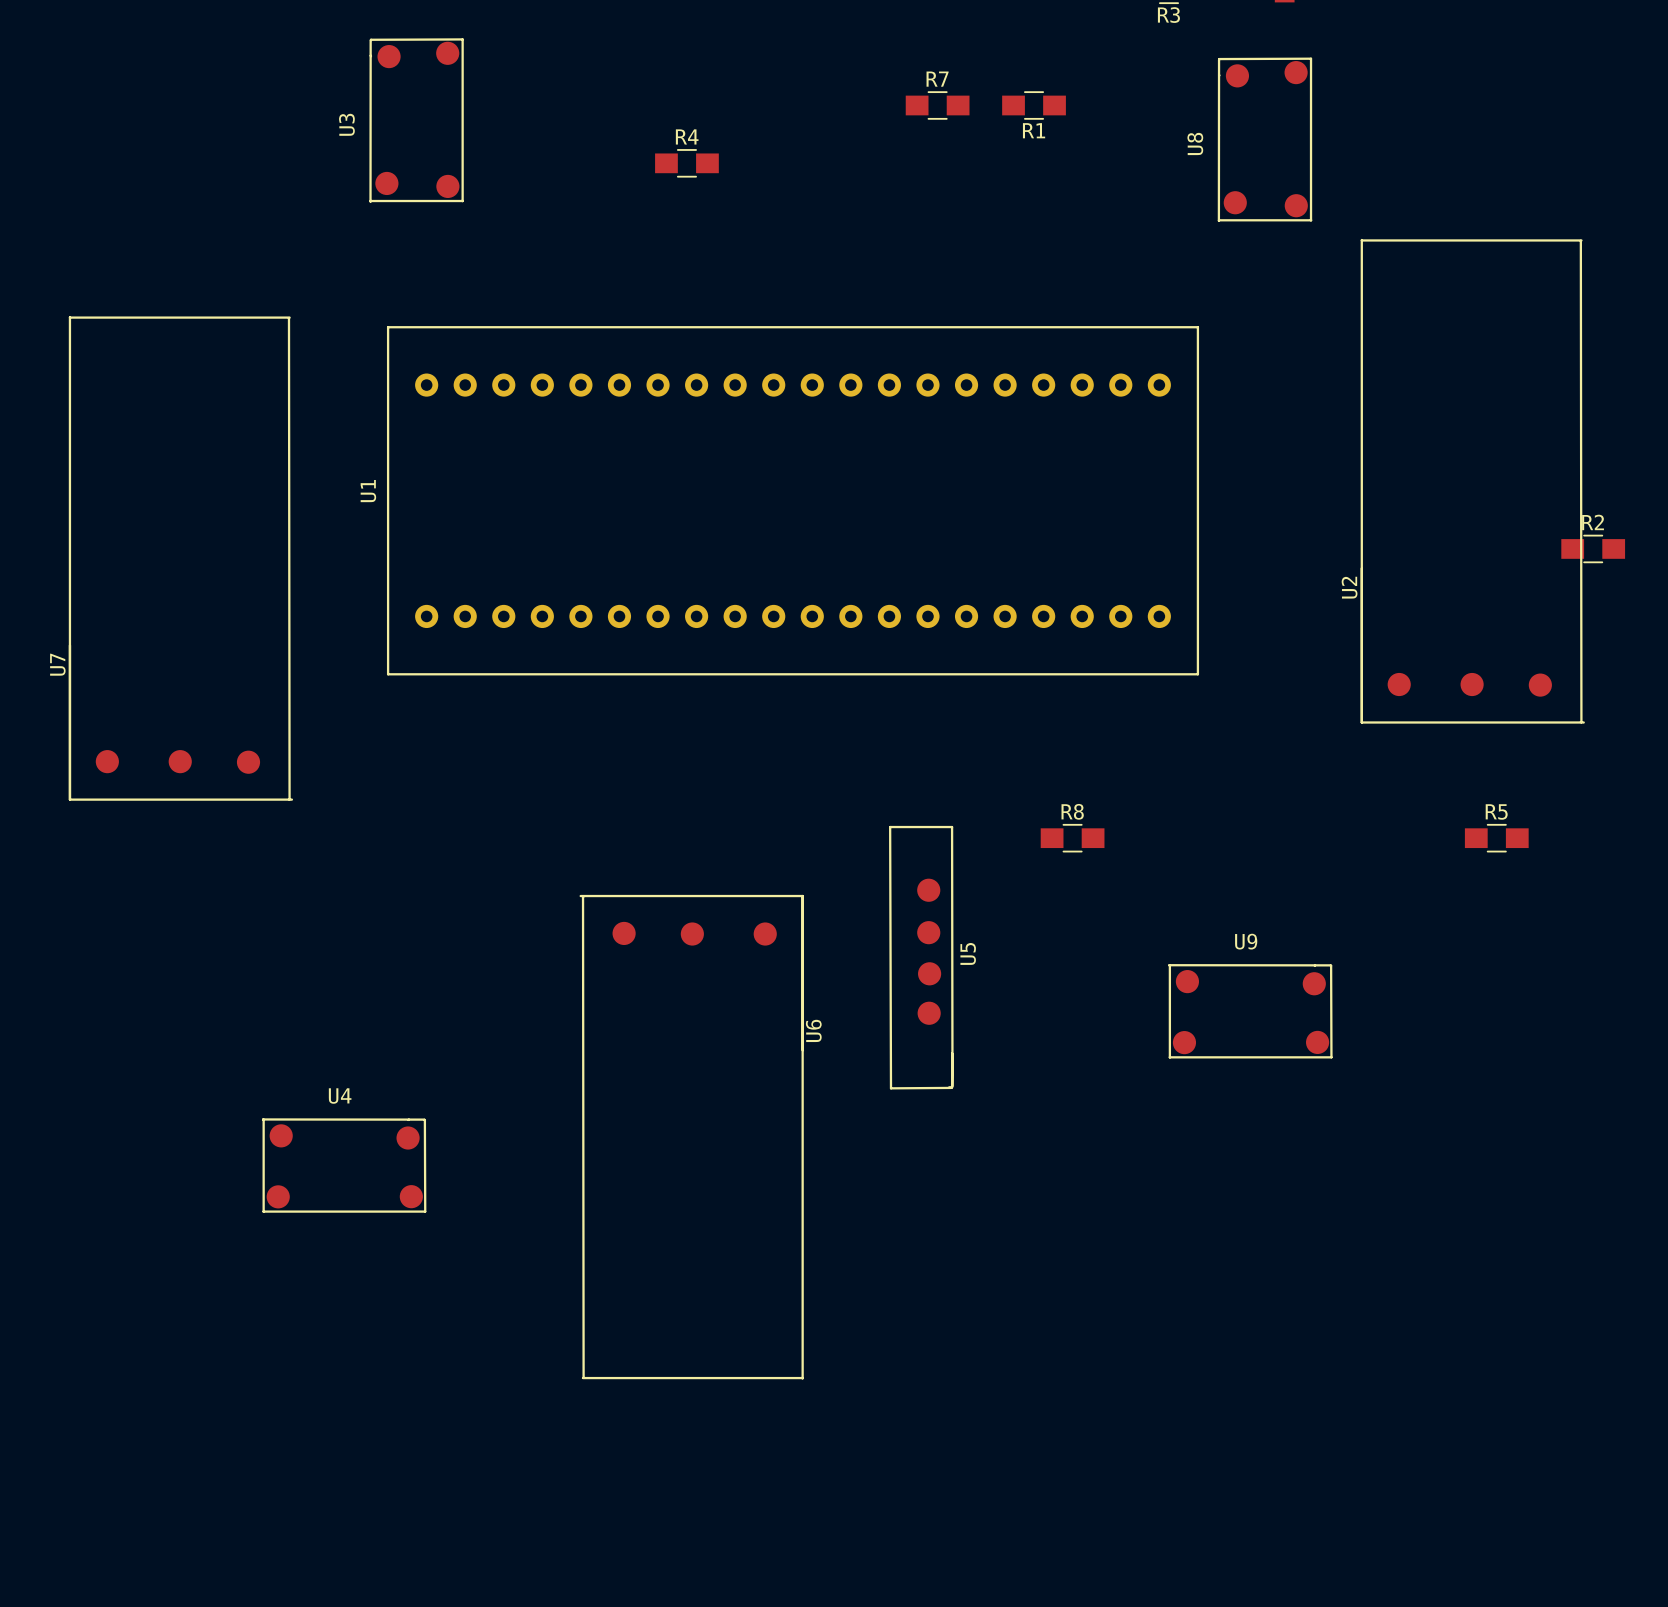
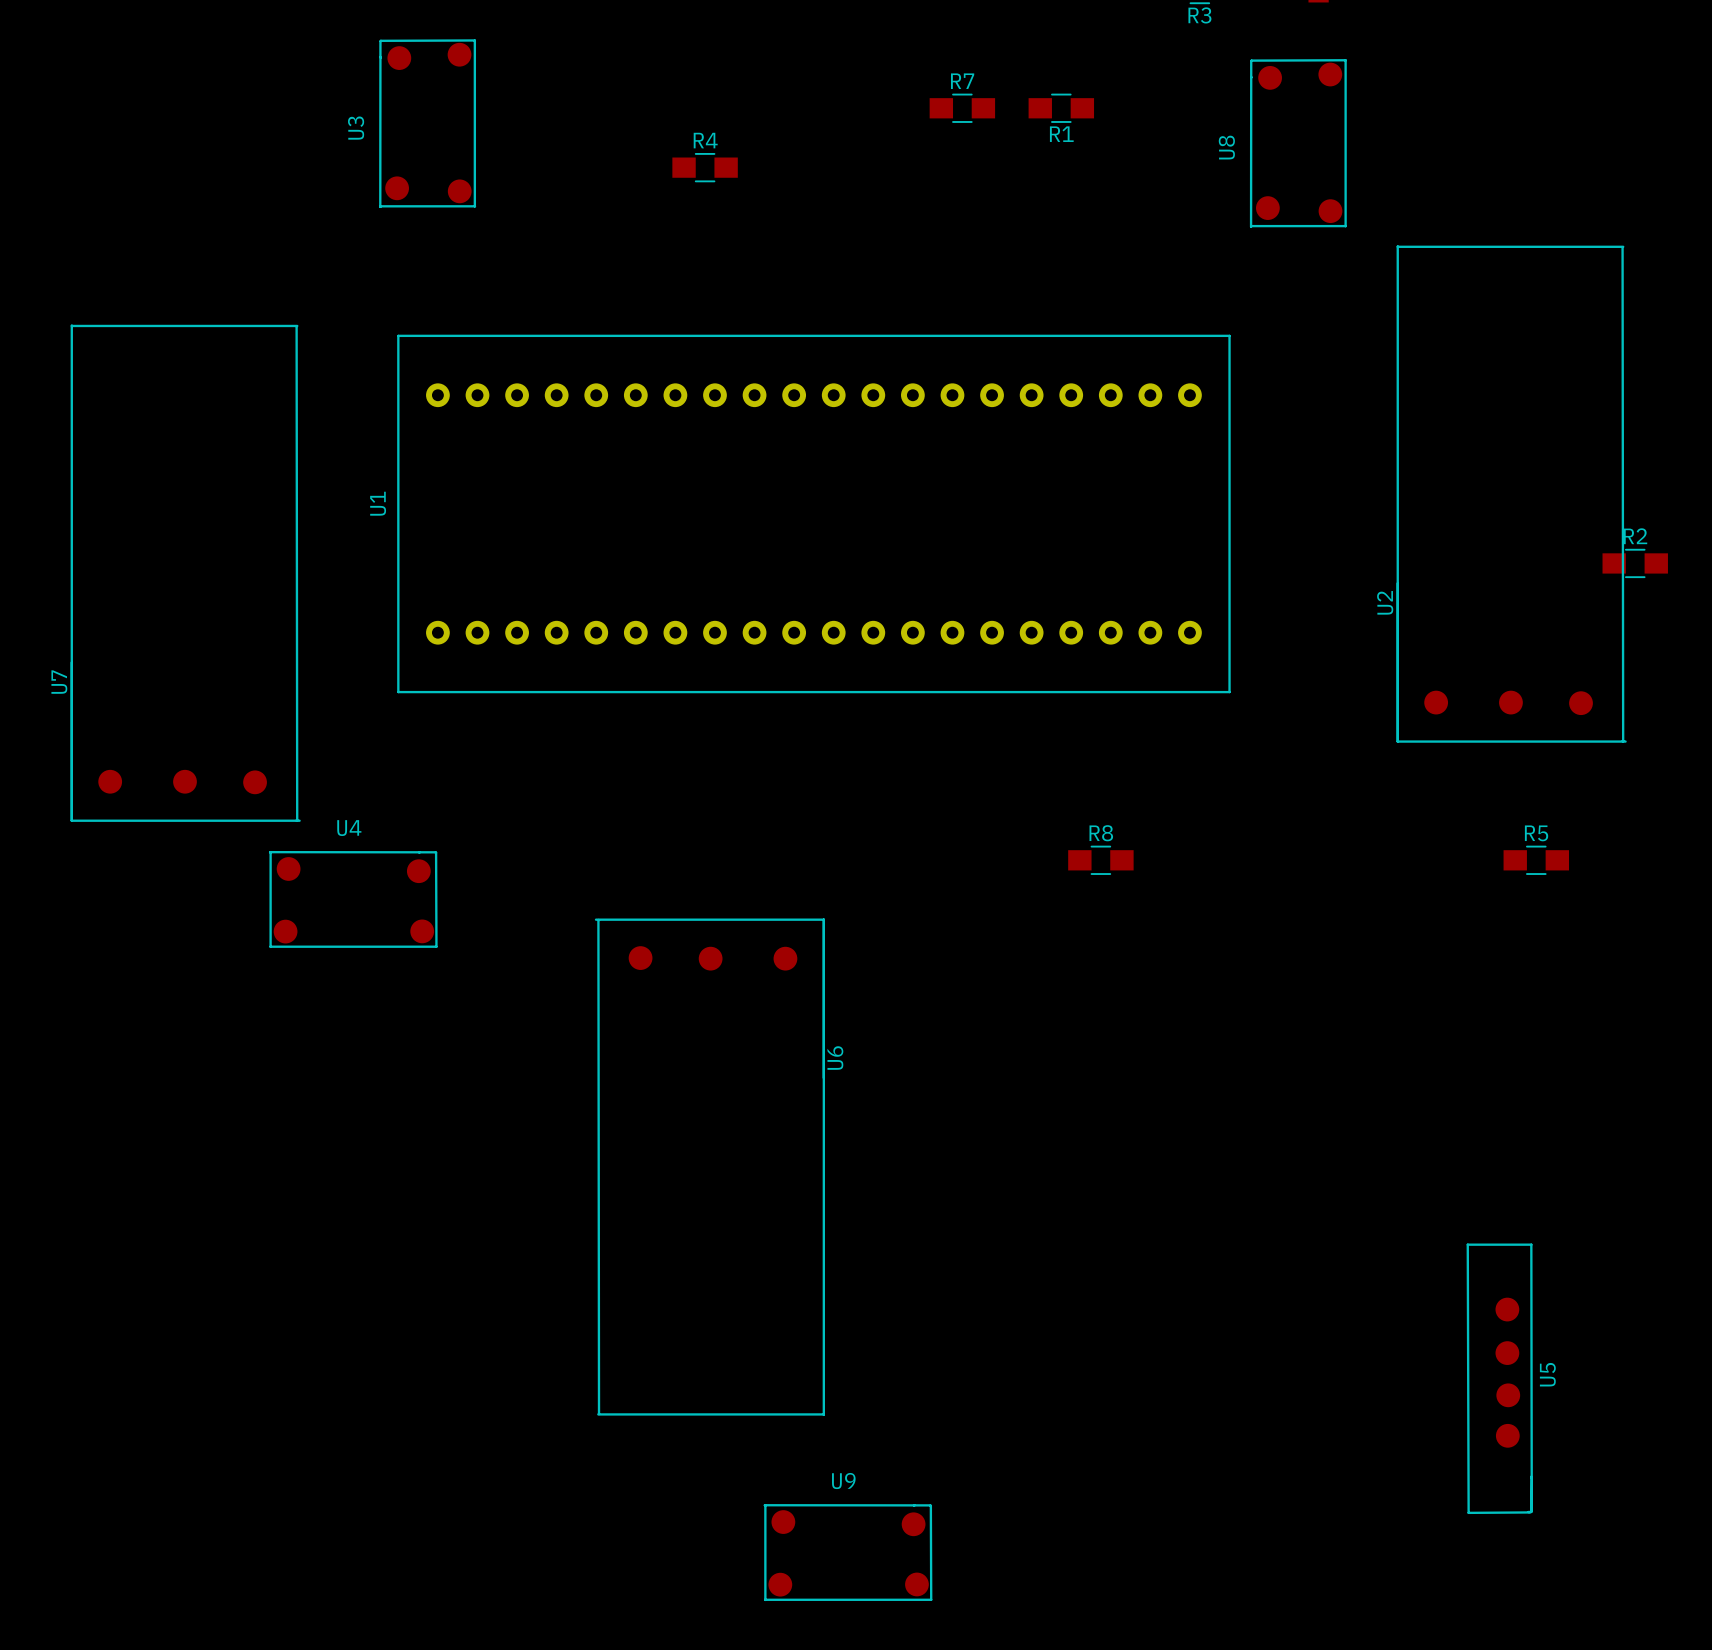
U5 position: (921, 957) -> (1499, 1378)
U9 position: (1250, 1011) -> (848, 1552)
U4 position: (344, 1165) -> (353, 899)

